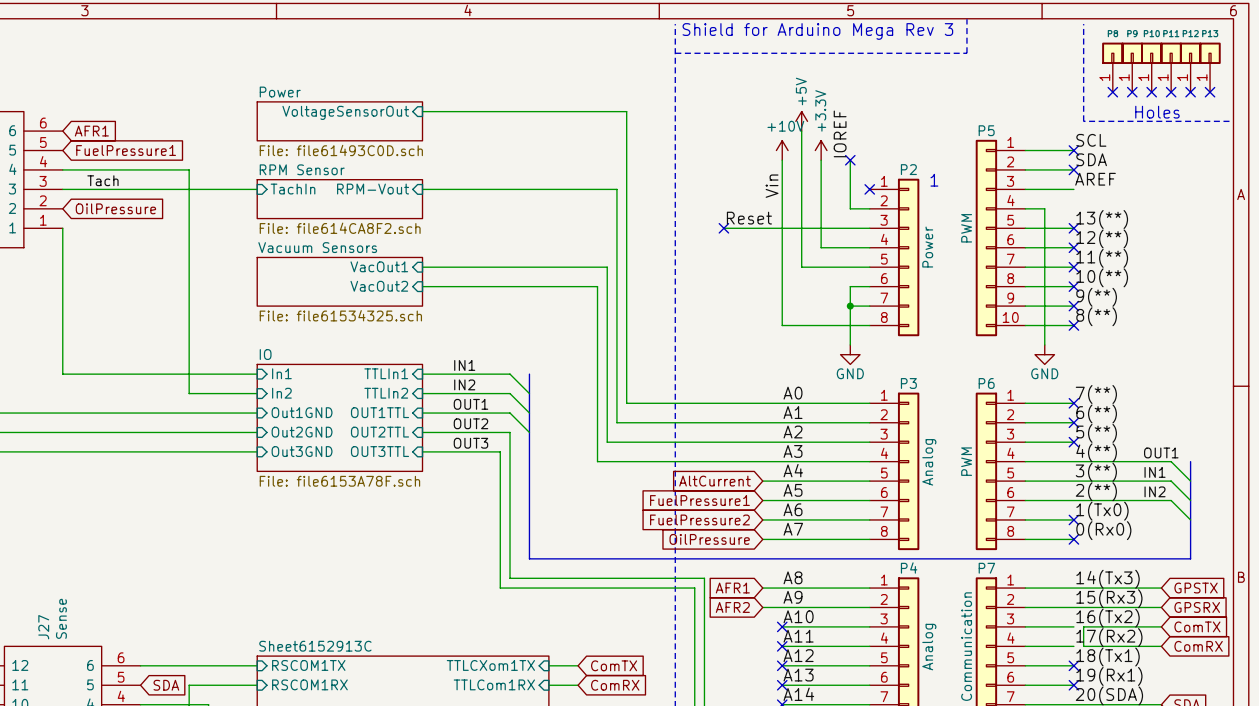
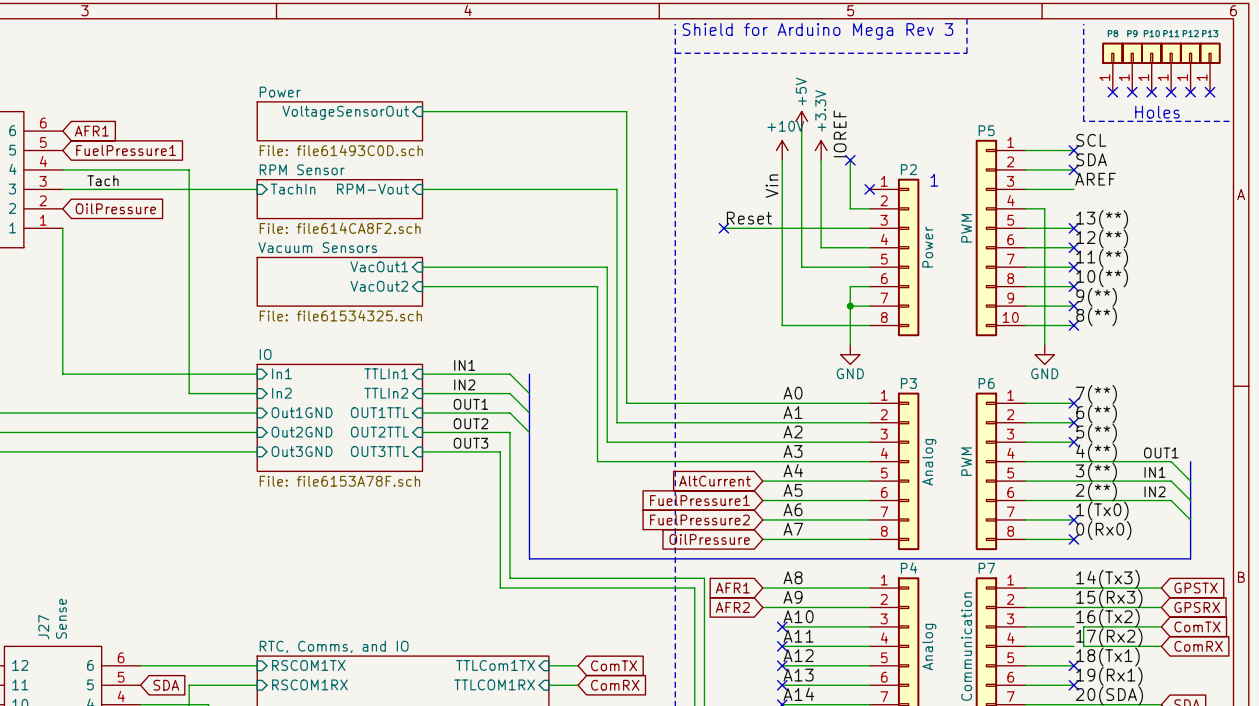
sheet Sheet6152913C name: Sheet6152913C (315, 646) -> RTC, Comms, and IO (334, 646)
sheet pin: TTLCXom1TX (490, 665) -> TTLCom1TX (495, 665)
sheet pin: TTLCom1RX (494, 684) -> TTLCOM1RX (494, 684)

